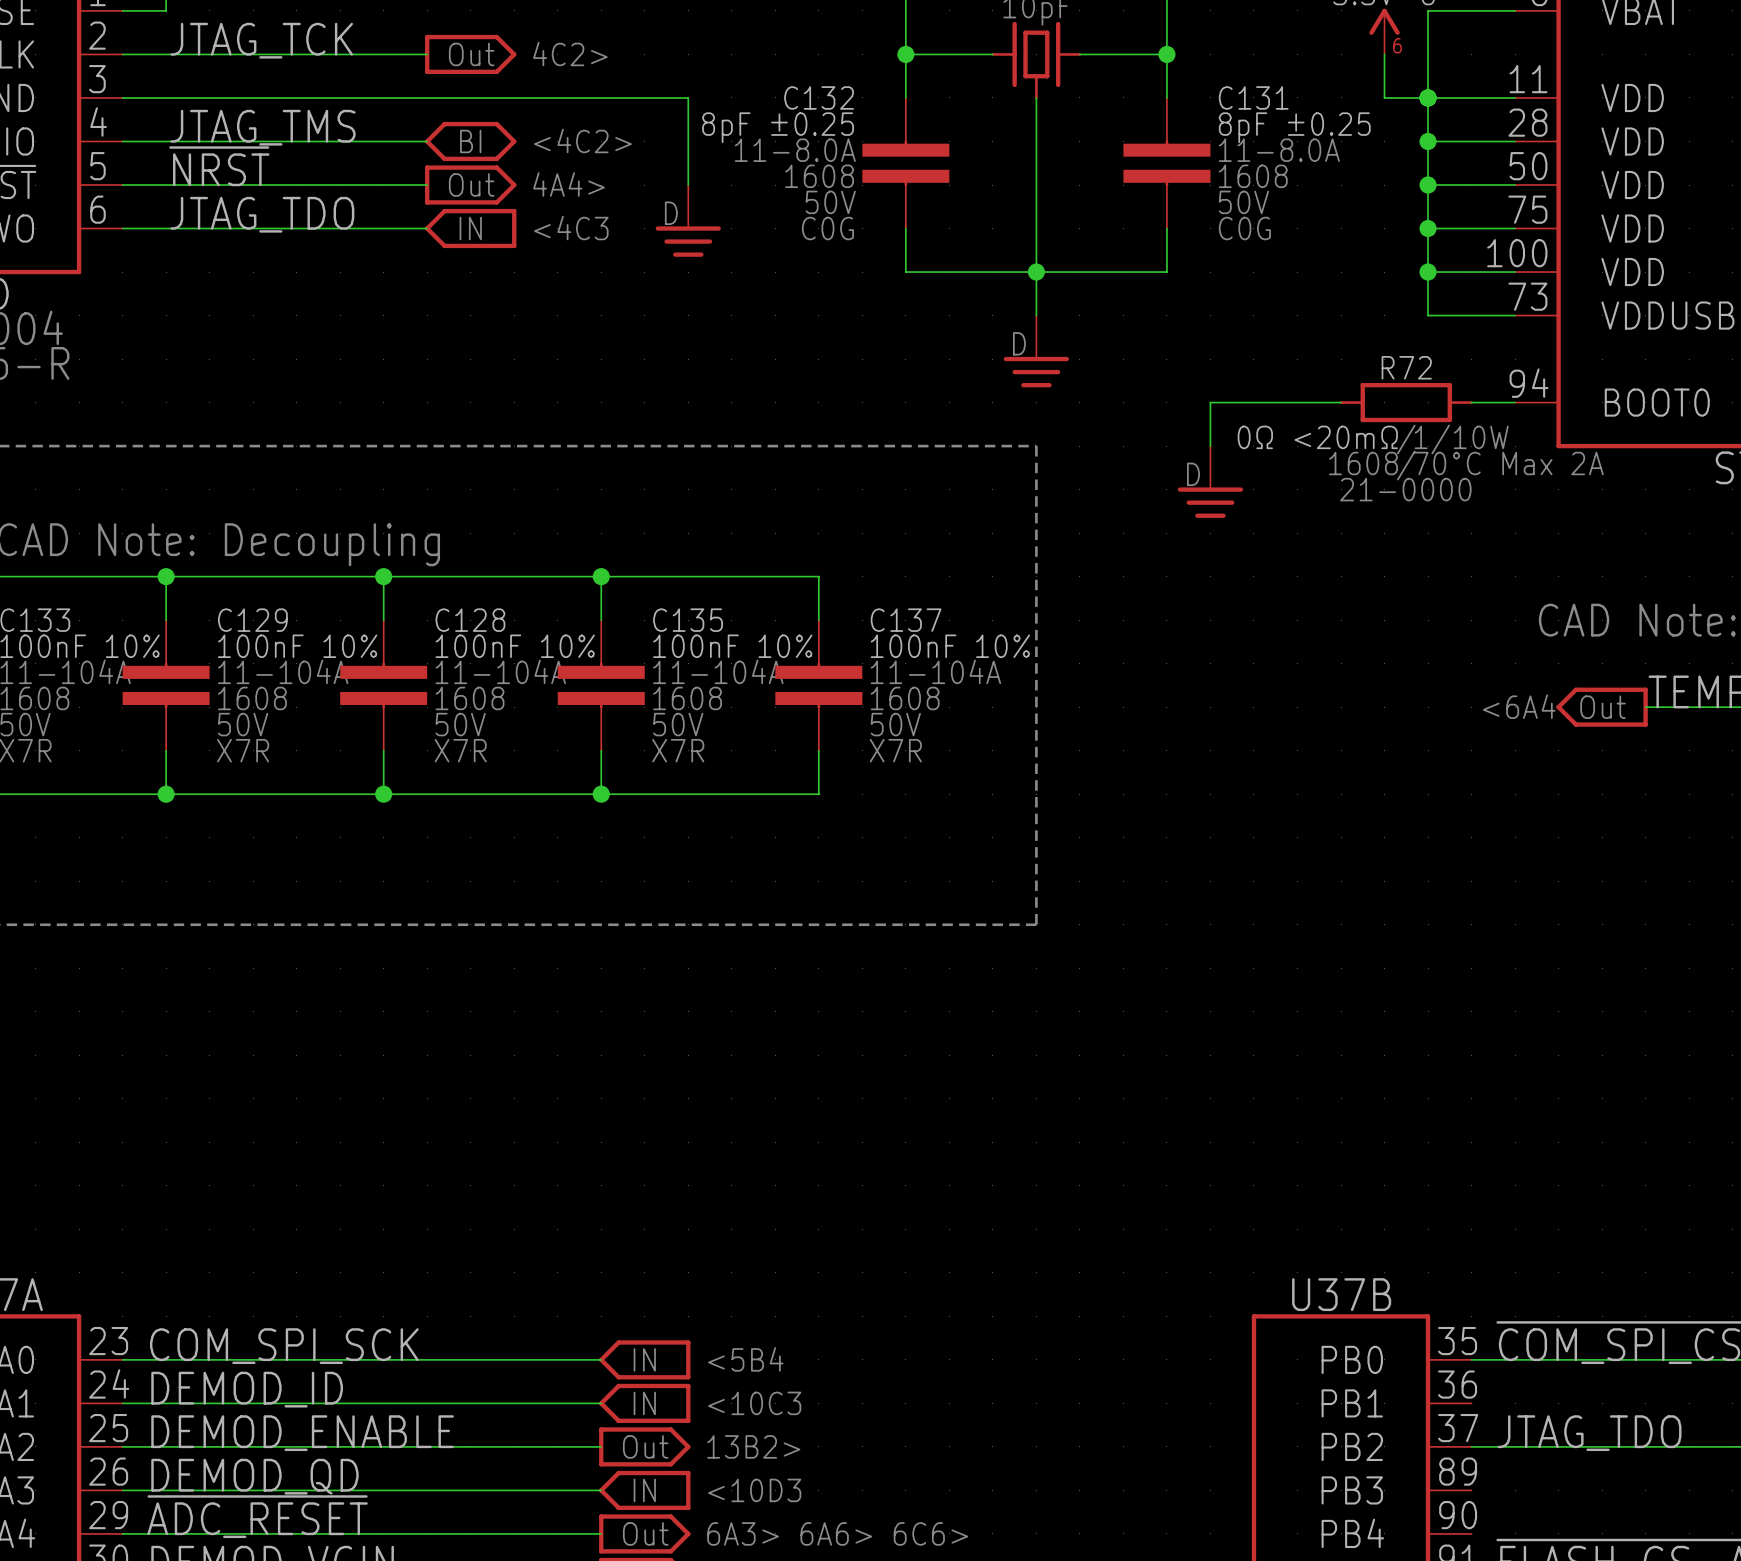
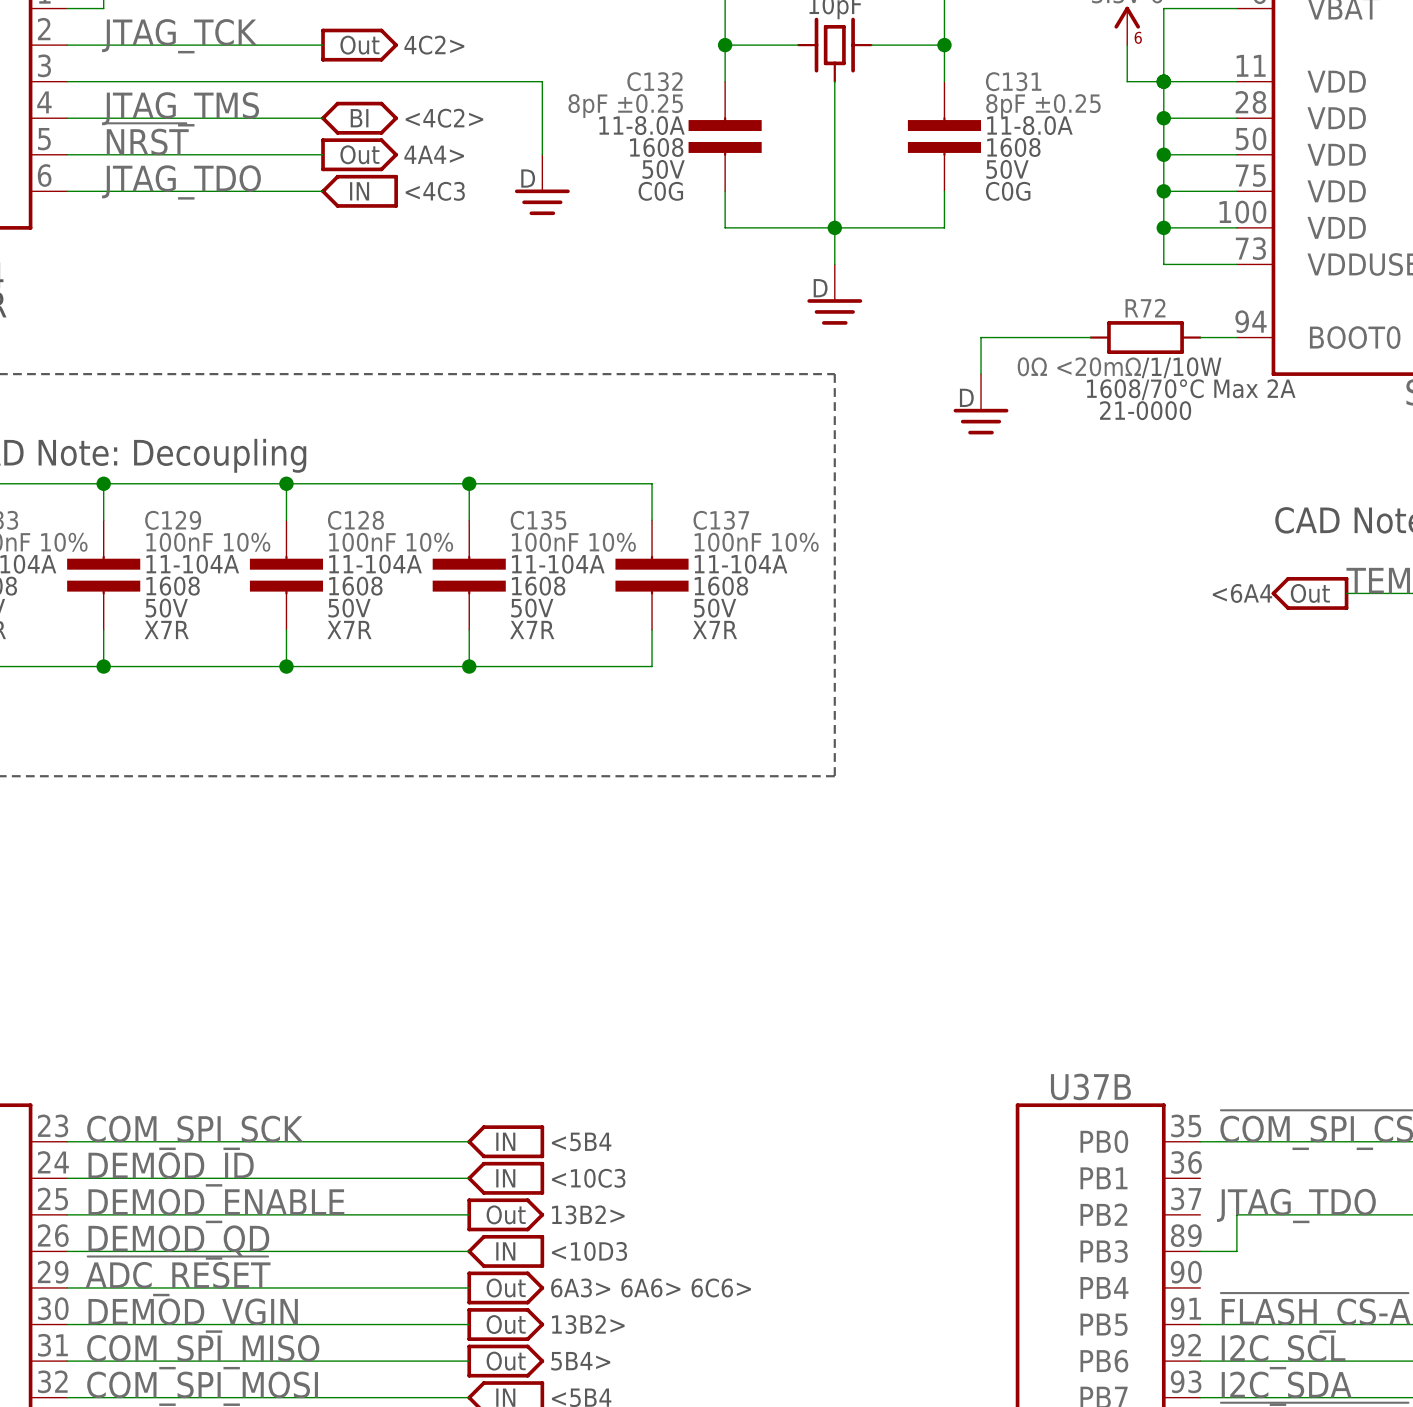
wire: (1471, 1446) (1515, 1446) -> (1200, 1251) (1236, 1251) (1236, 1214)

